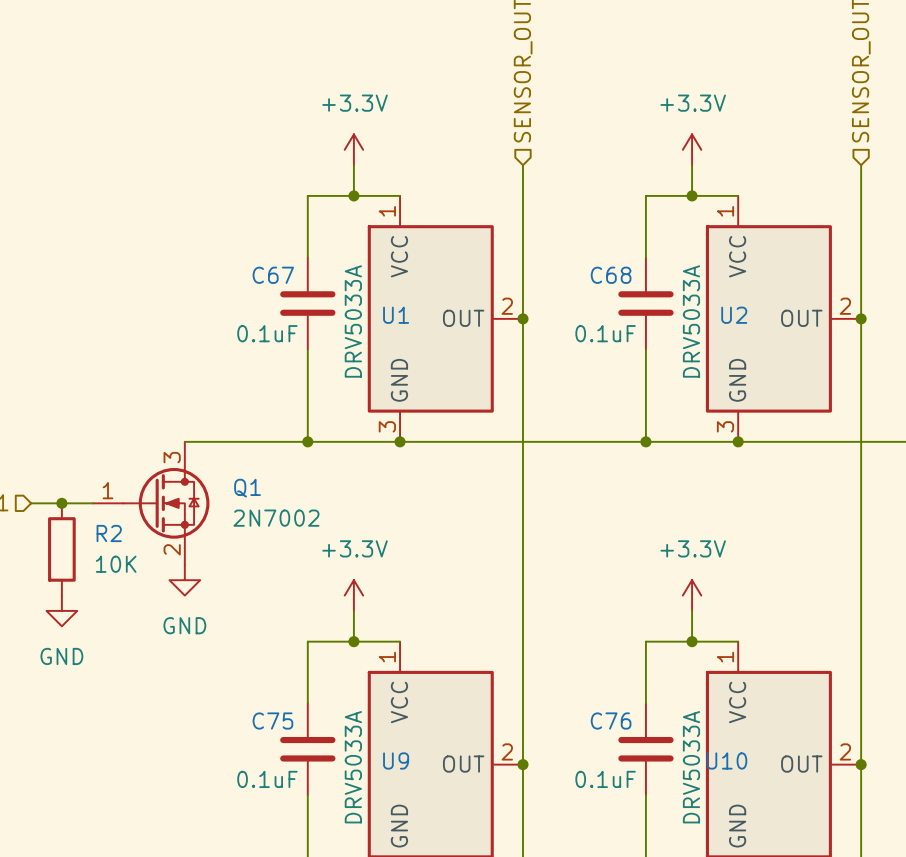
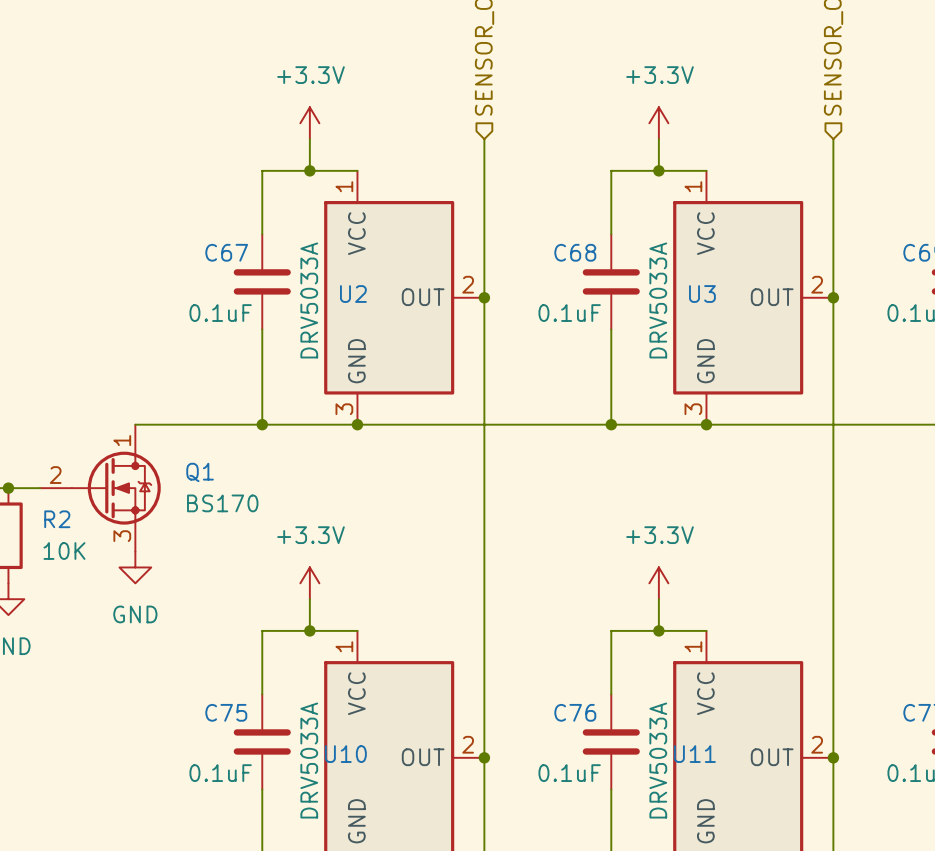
U1 name: U1 (396, 315) -> U2 (353, 294)
U2 name: U2 (734, 315) -> U3 (702, 294)
Q1 symbol: [92, 441, 210, 565] -> [40, 424, 161, 552]
Q1 value: 2N7002 (276, 518) -> BS170 (222, 503)
U9 name: U9 (396, 760) -> U10 (345, 754)
U10 name: U10 (726, 760) -> U11 (694, 754)

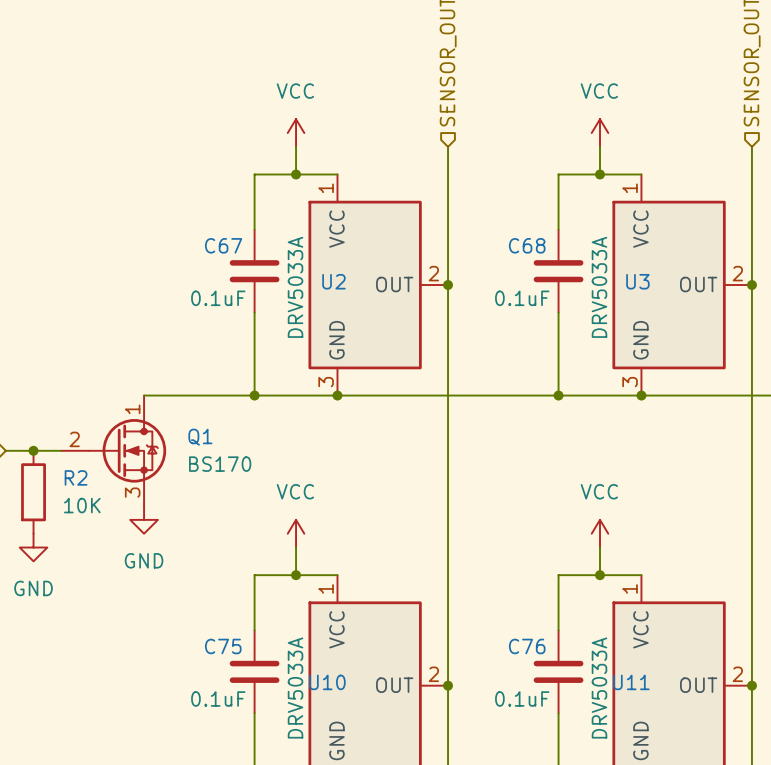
power symbol: +3.3V (309, 123) -> VCC (296, 133)
power symbol: +3.3V (658, 123) -> VCC (599, 133)
power symbol: +3.3V (309, 583) -> VCC (296, 533)
power symbol: +3.3V (658, 583) -> VCC (599, 533)

